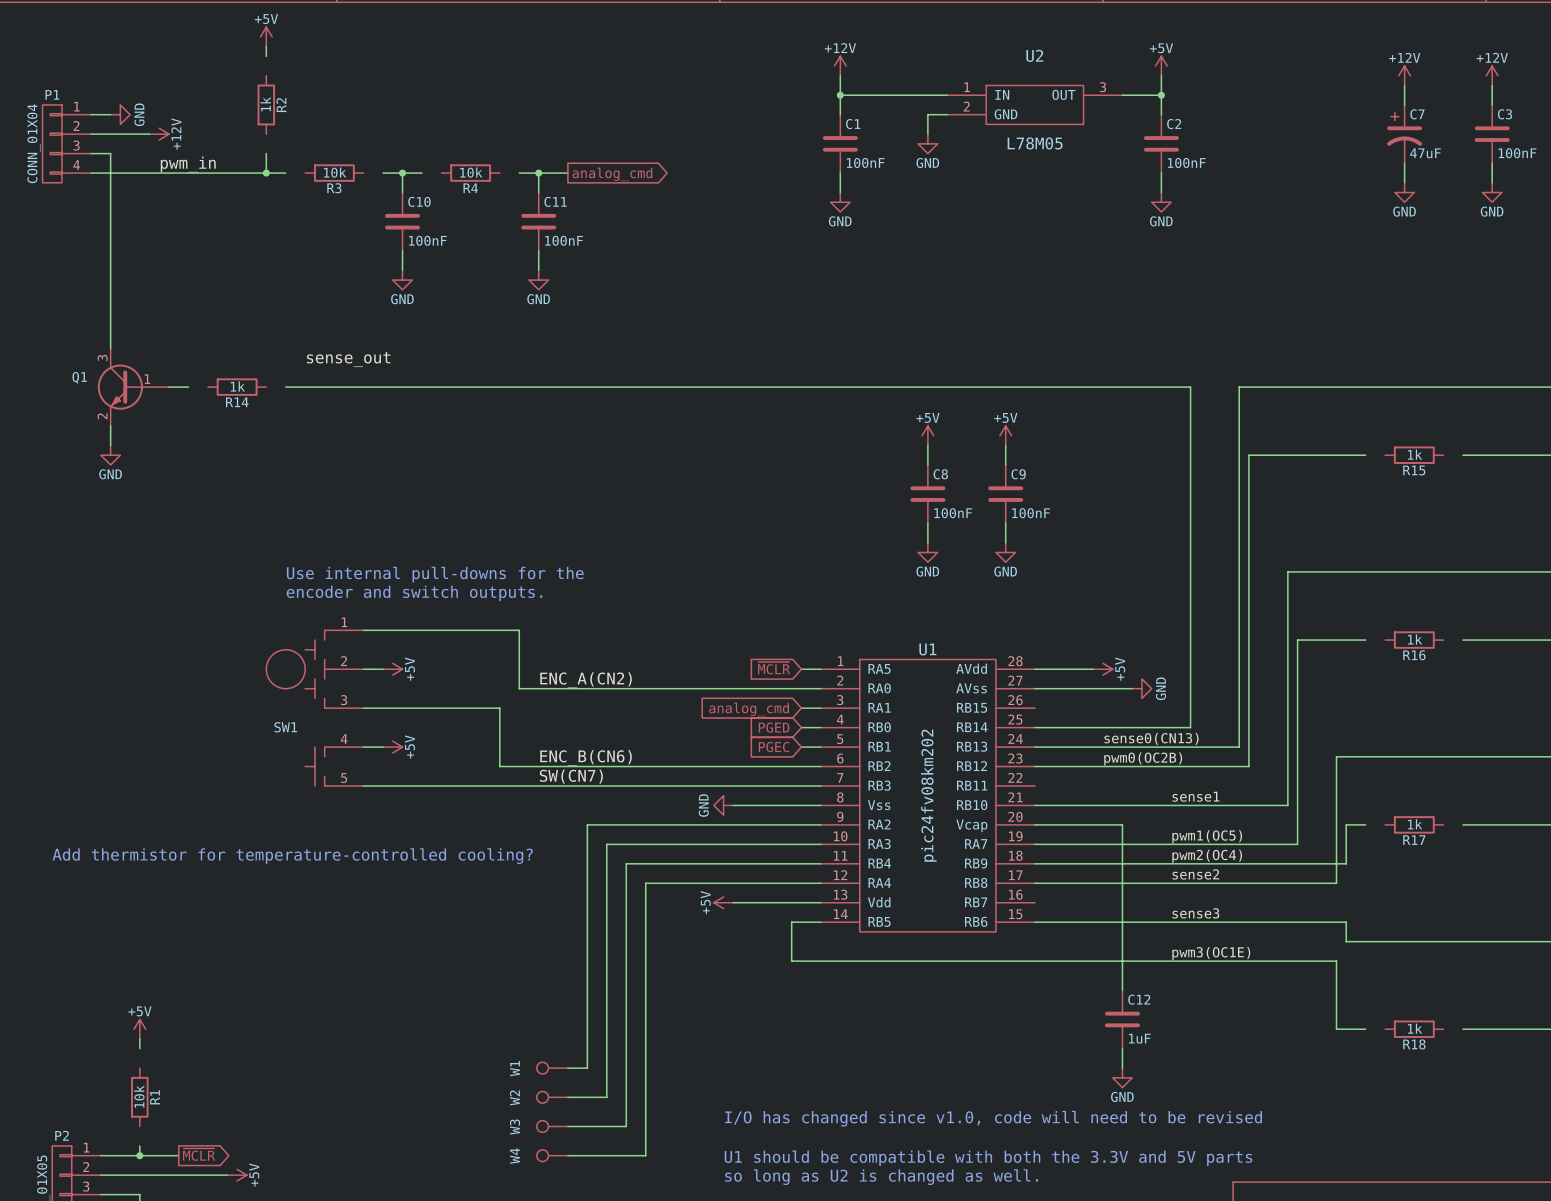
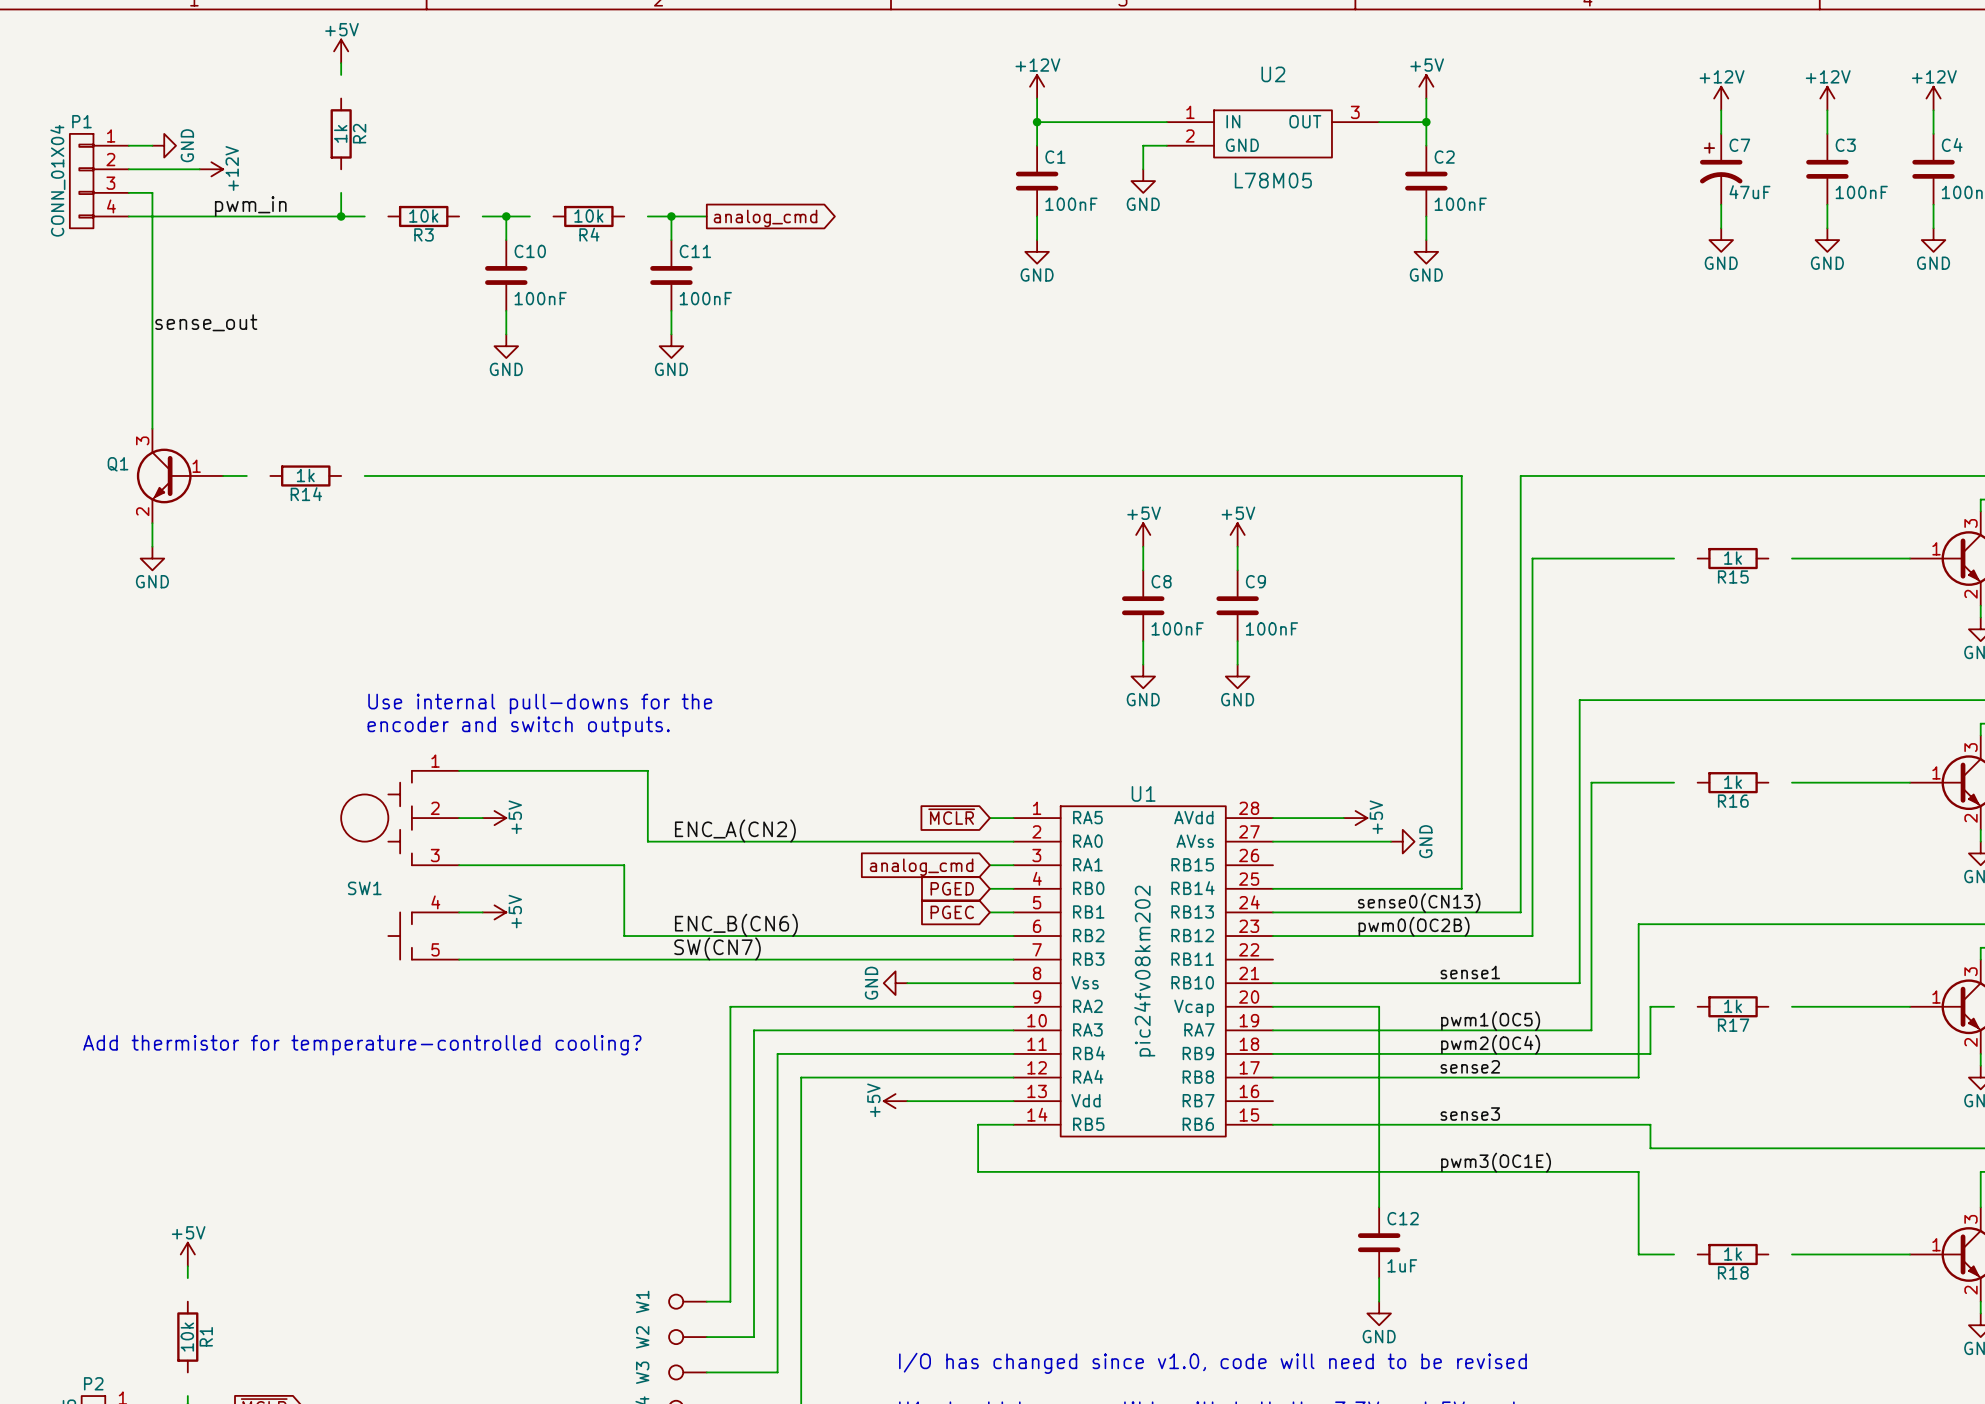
label: none -> sense_out (206, 322)
label: sense_out (348, 359) -> none

